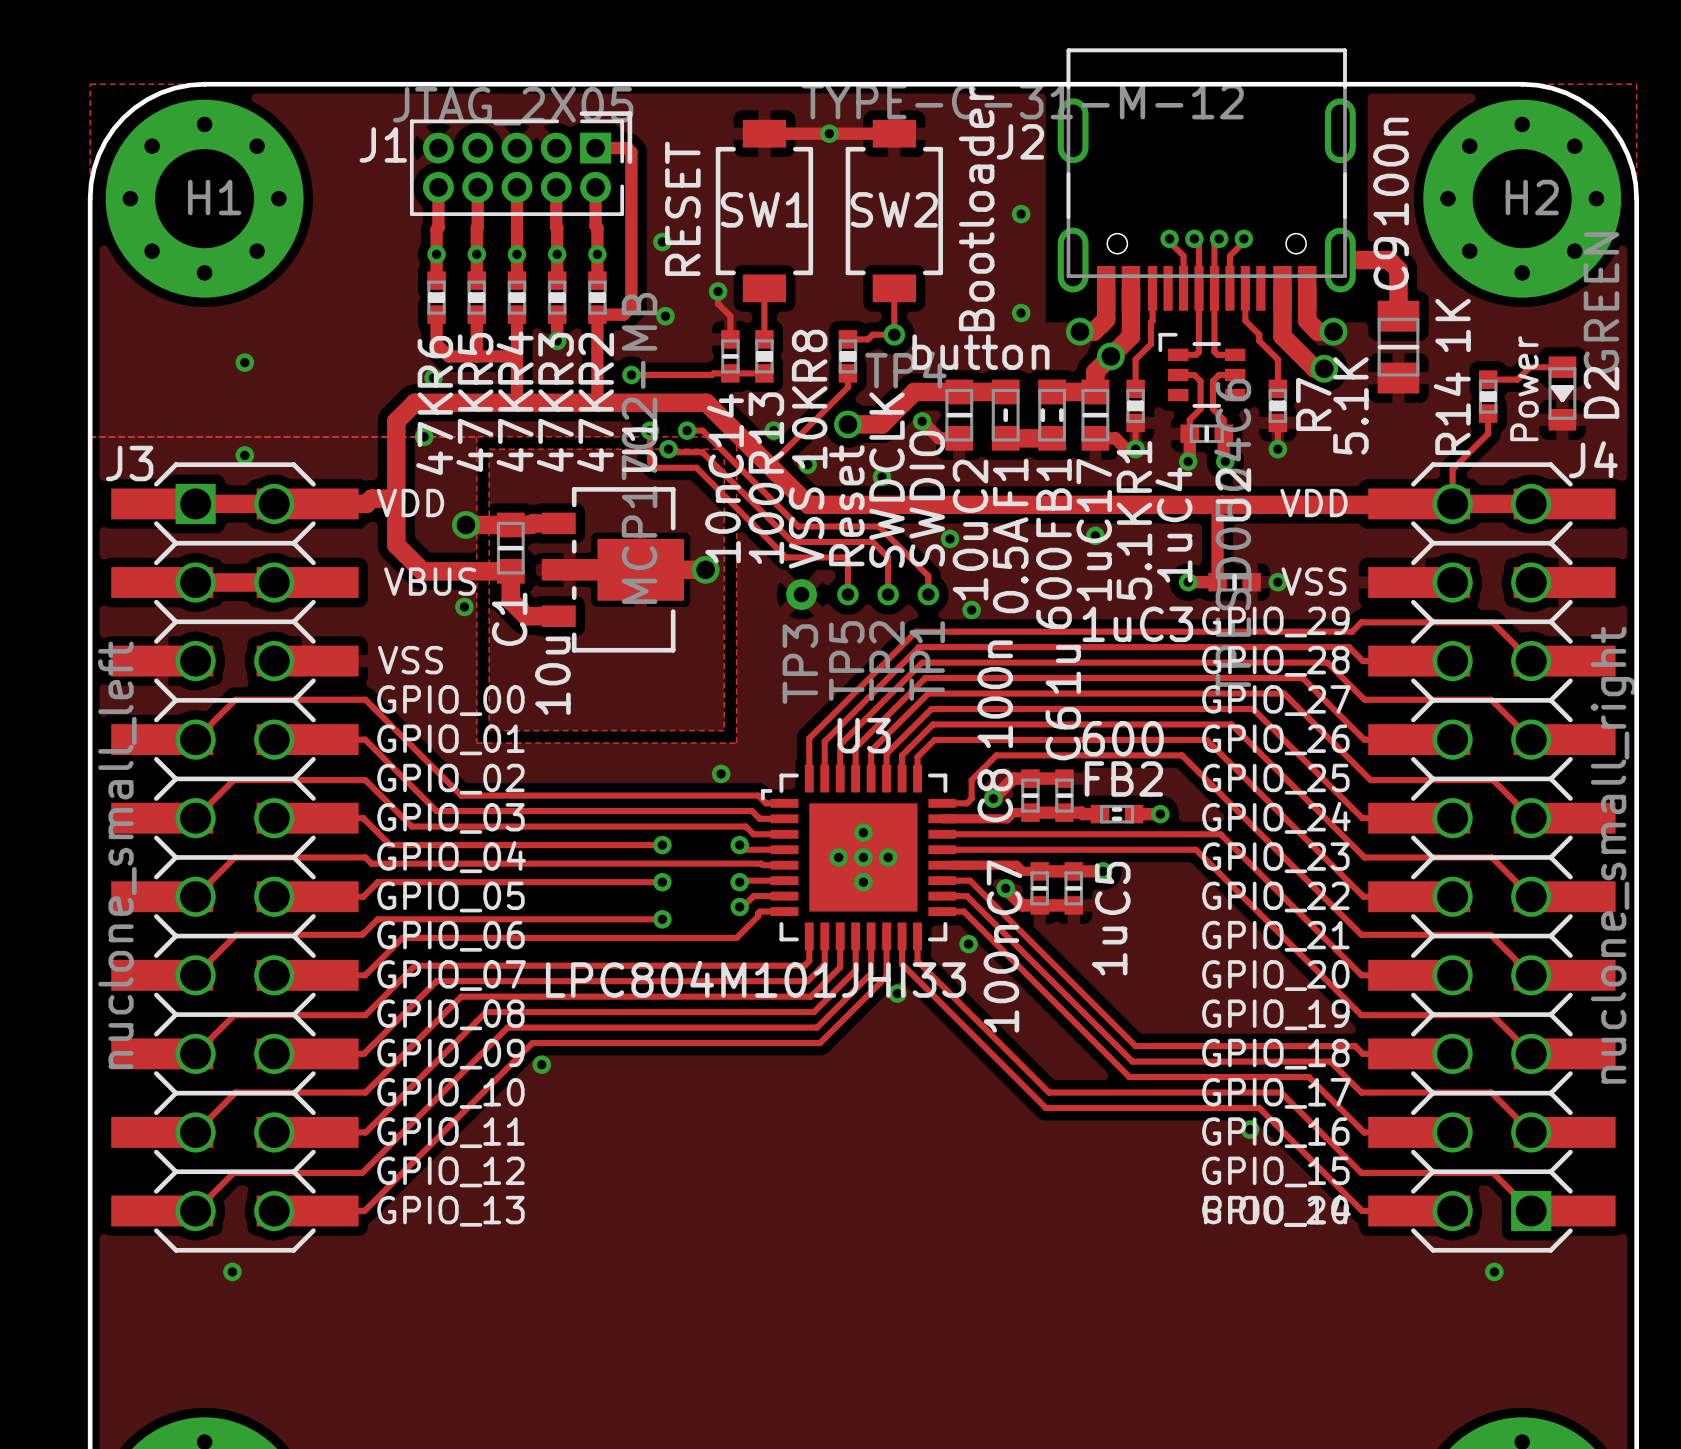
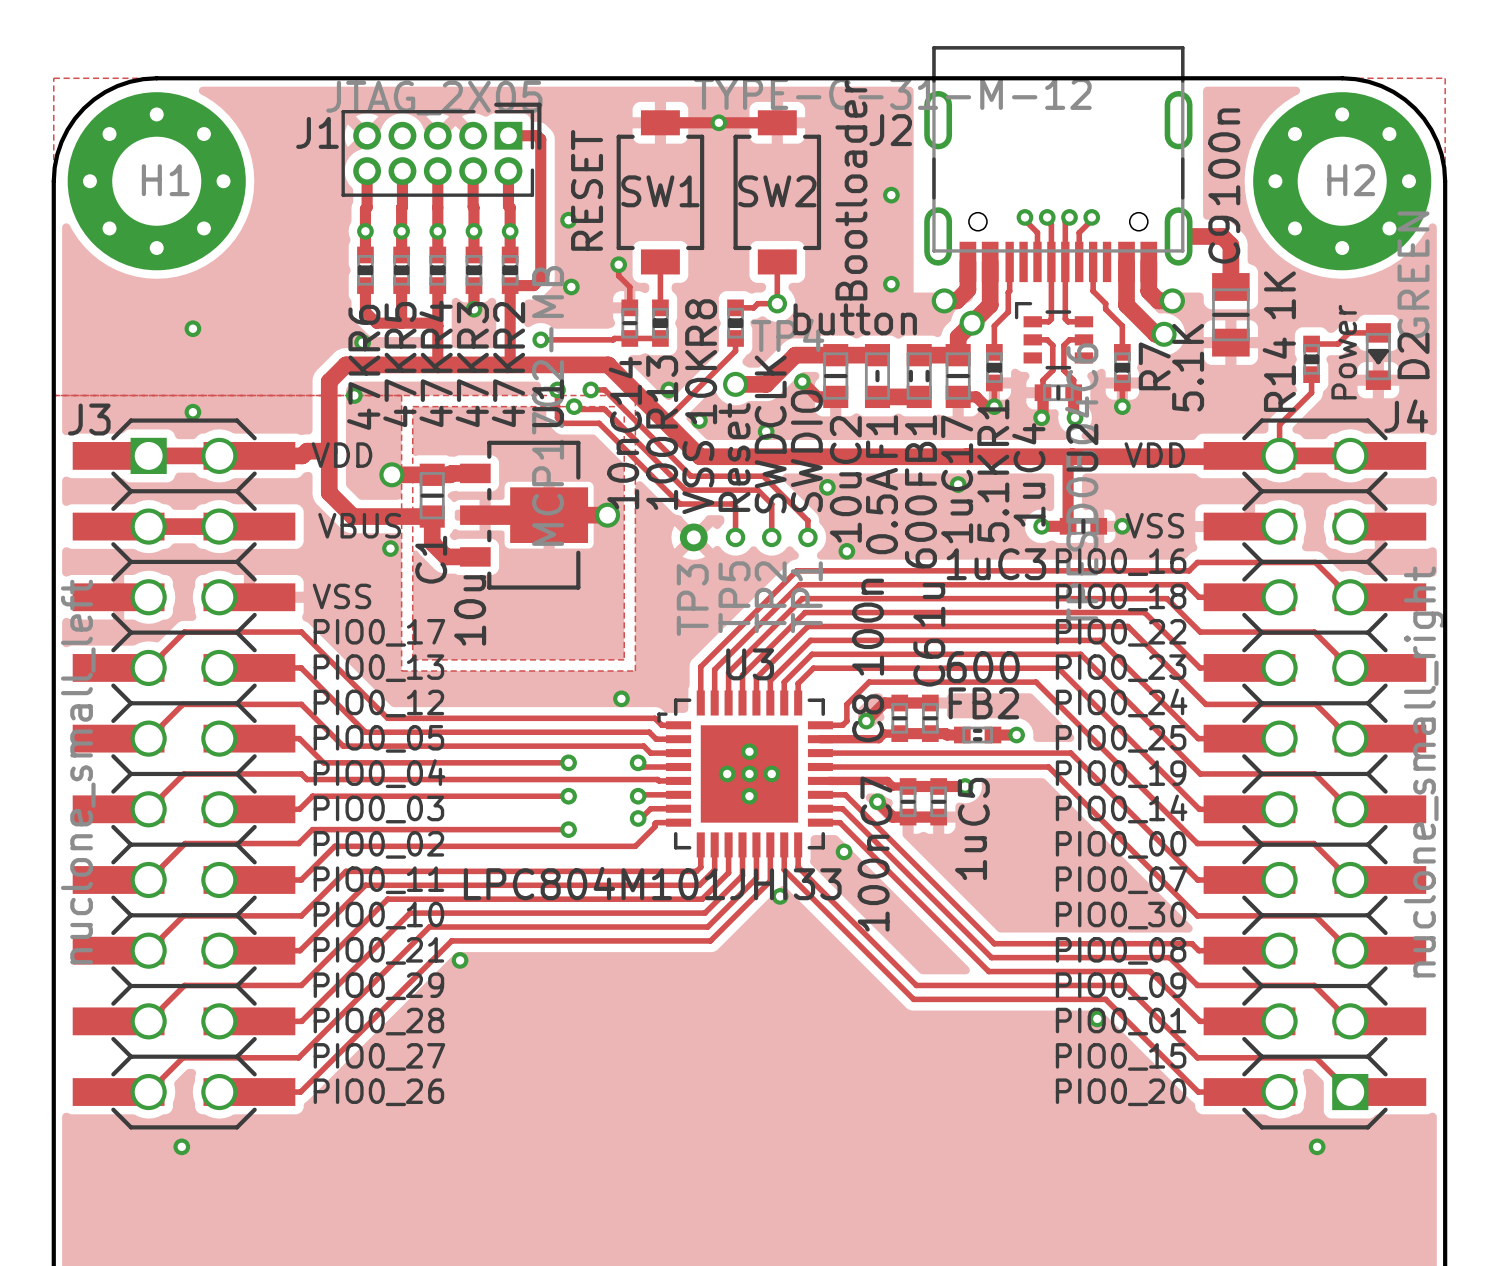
J3 footprint: [111, 462, 359, 1253] -> [72, 418, 296, 1130]
J4 footprint: [1368, 462, 1616, 1253] -> [1203, 418, 1427, 1130]

